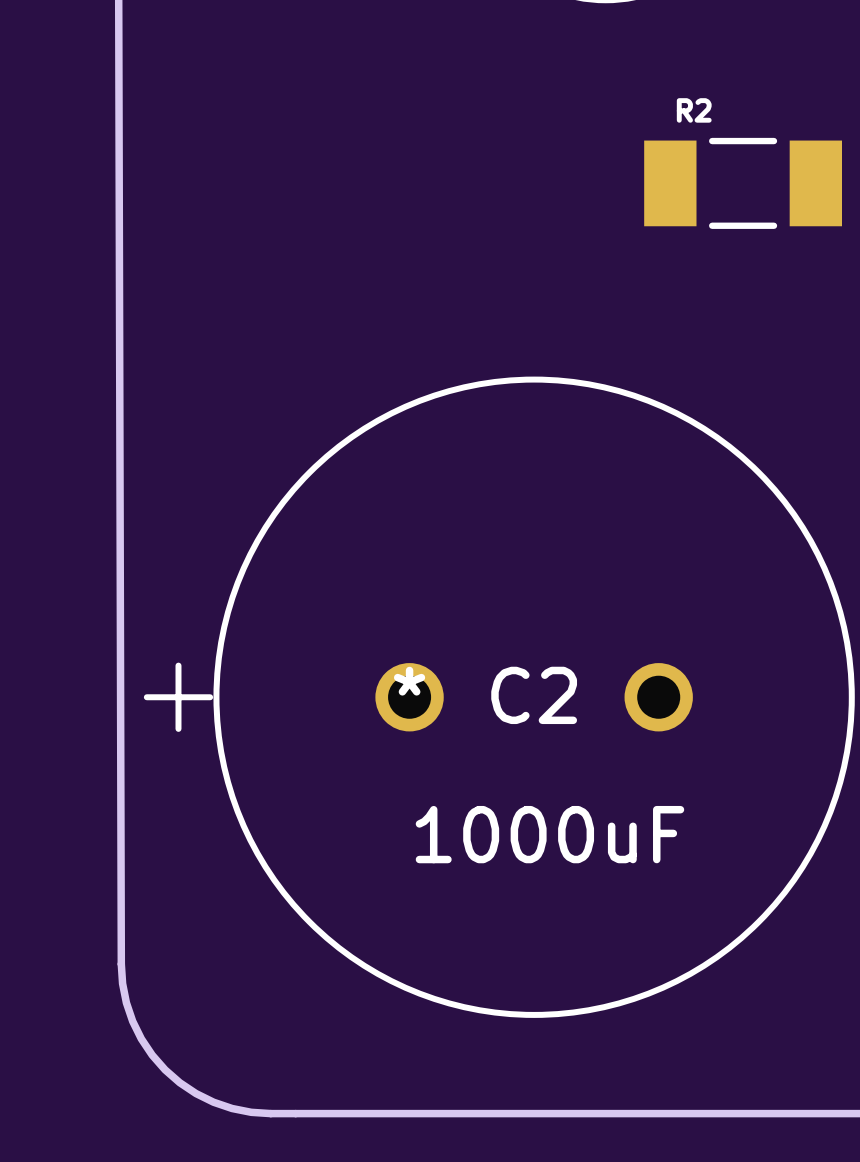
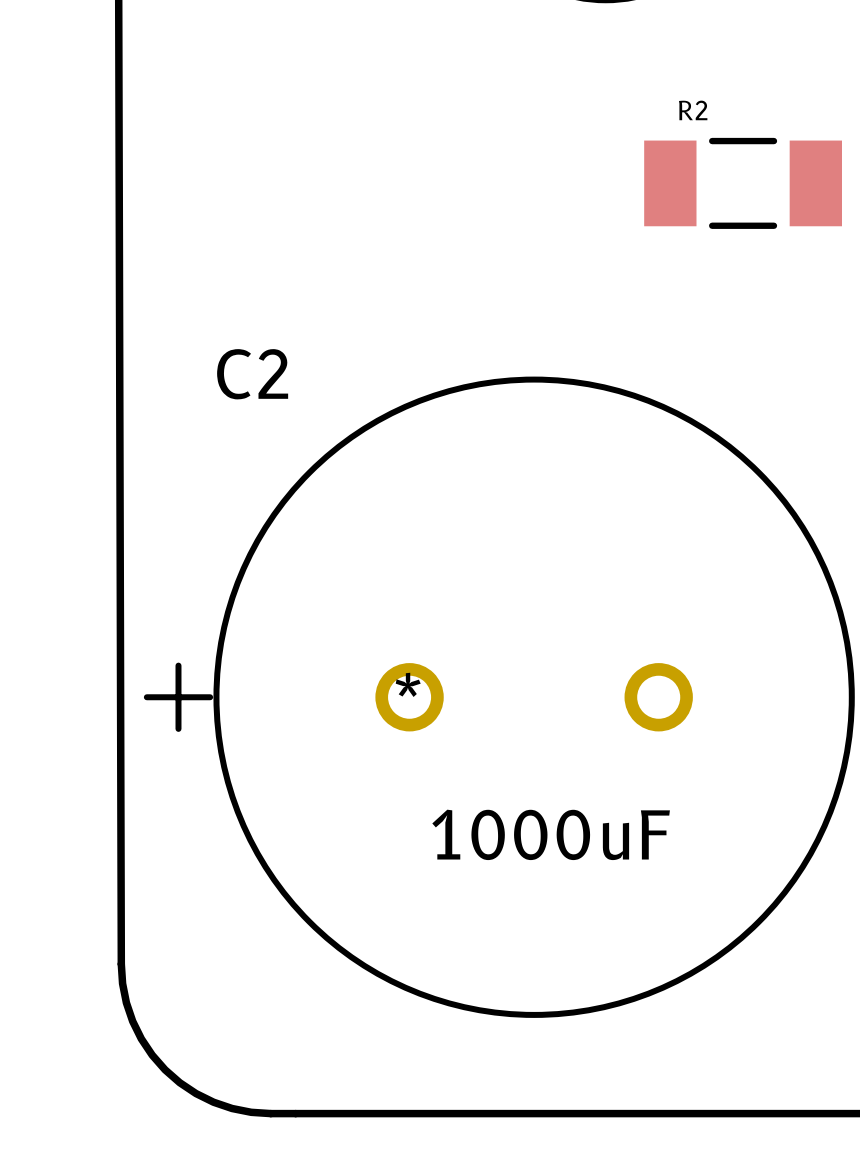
C2 name position: C2 (534, 695) -> C2 (252, 374)

